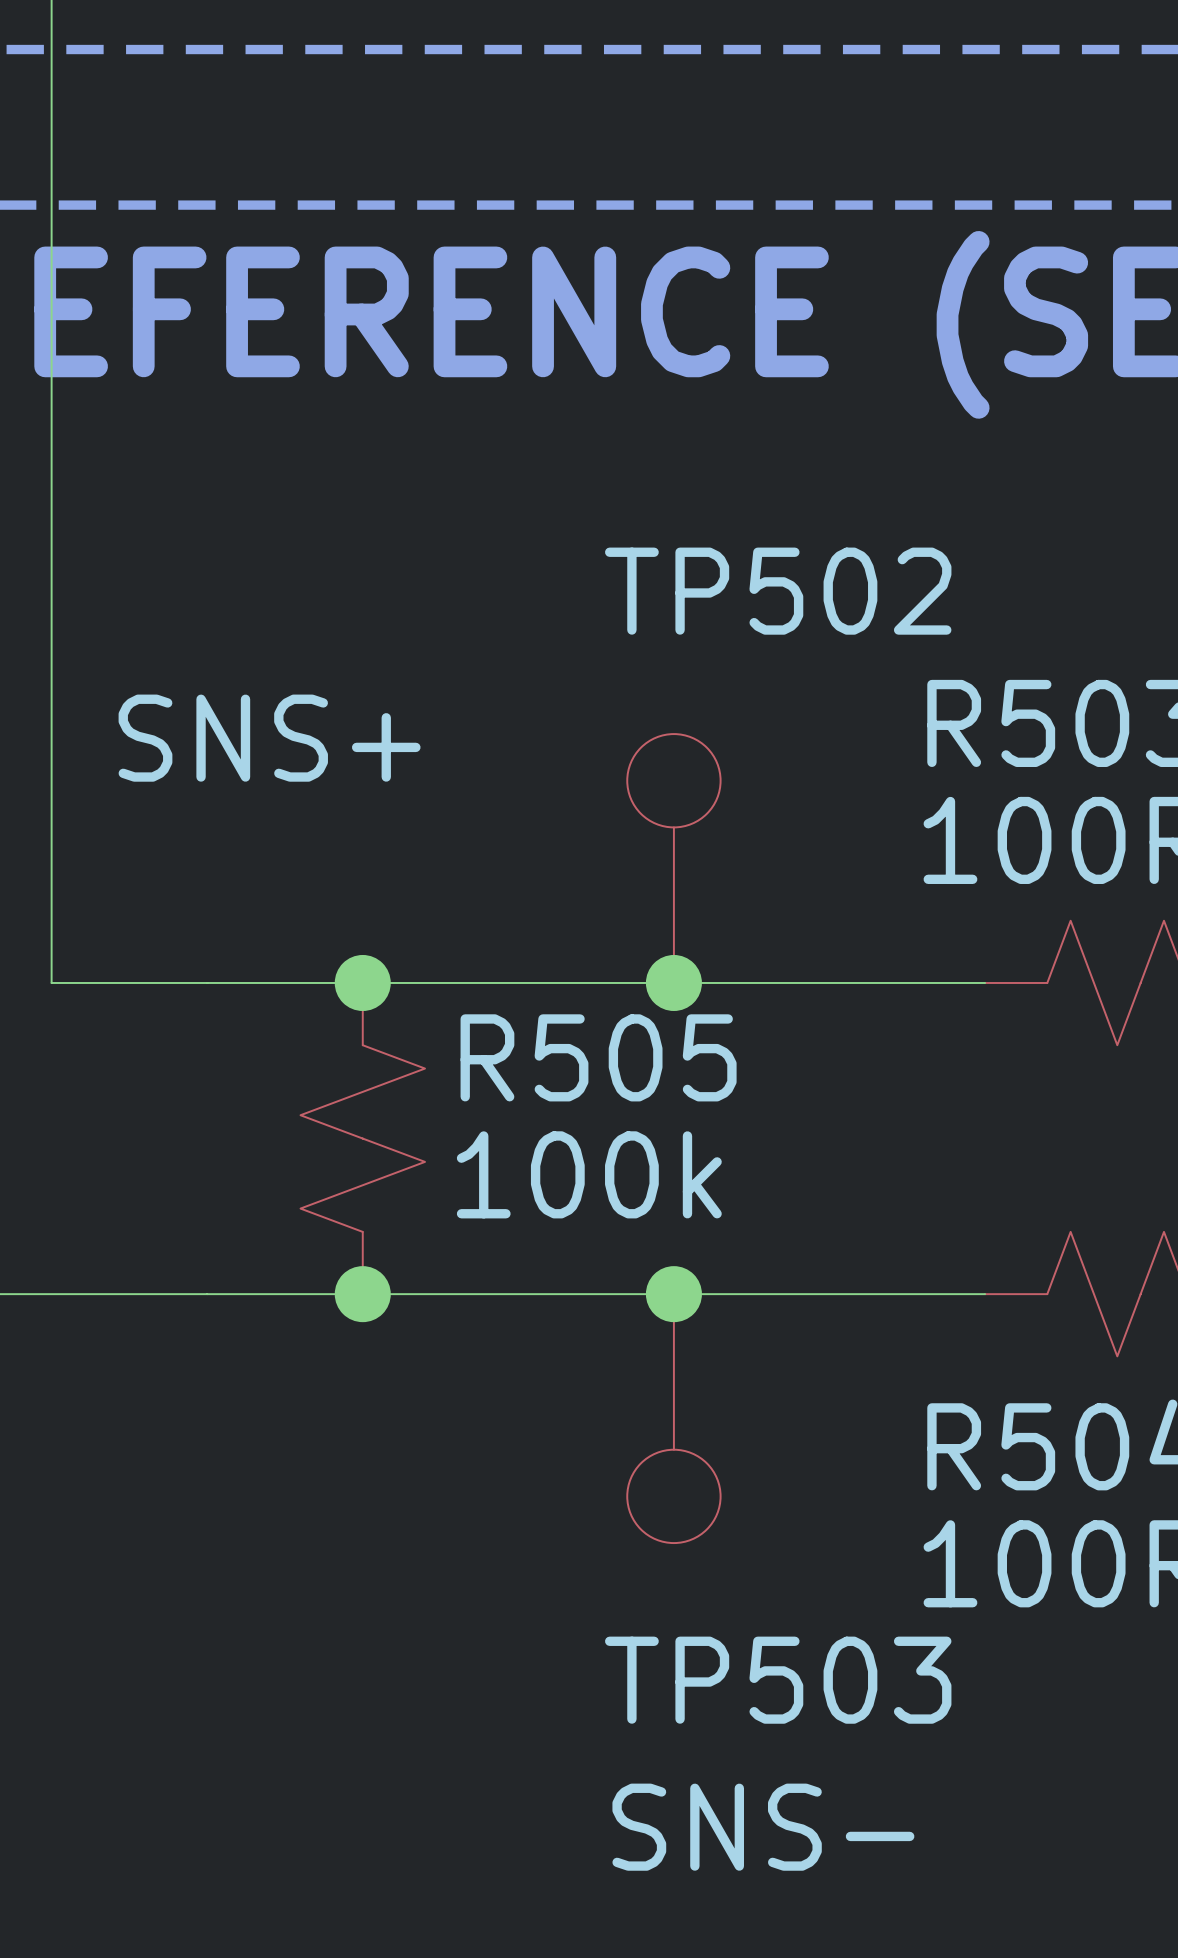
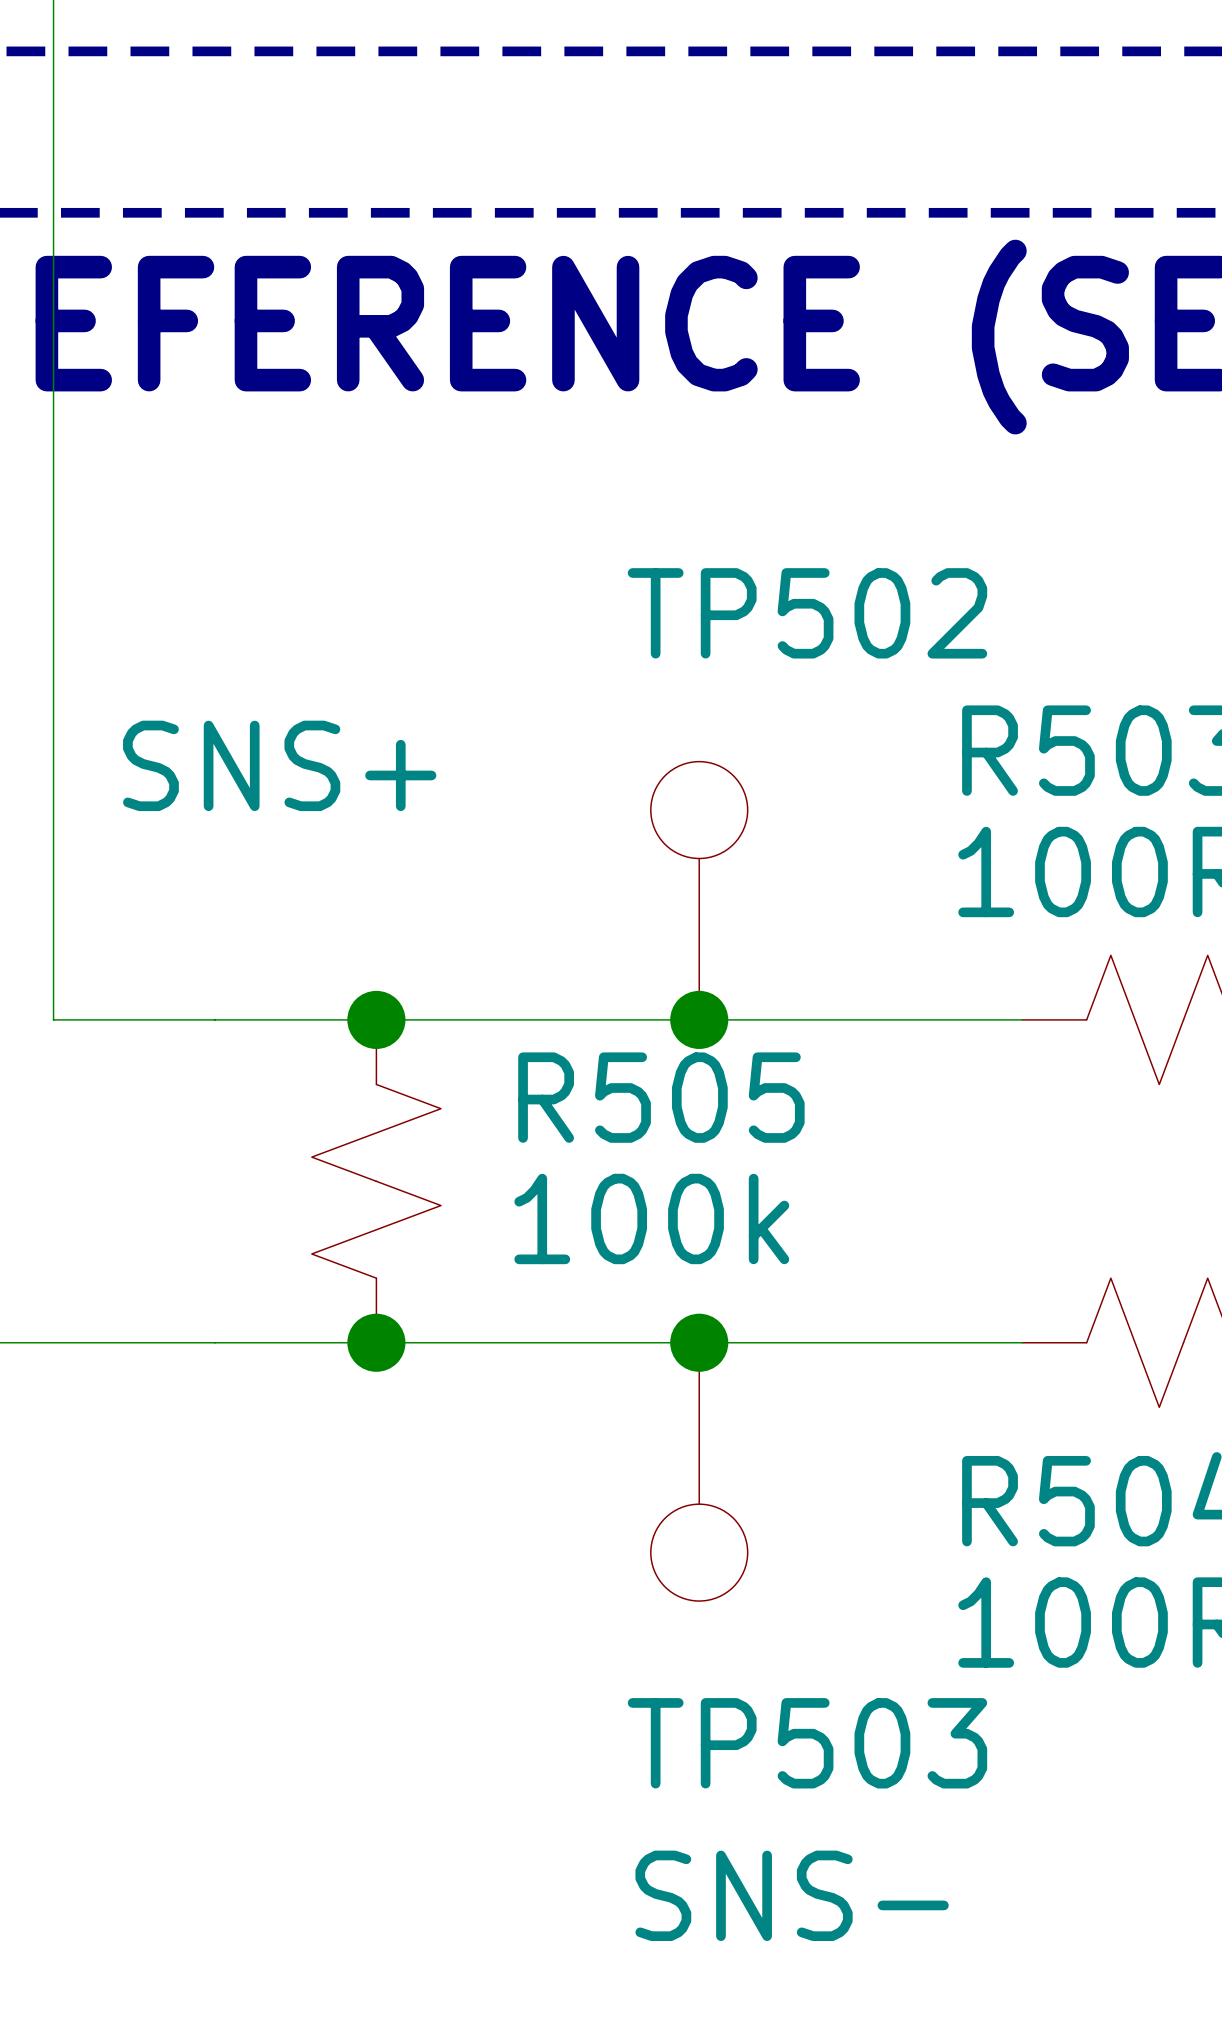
R505 name position: R505 (598, 1057) -> R505 (661, 1097)
R505 value position: 100k (589, 1174) -> 100k (651, 1218)

